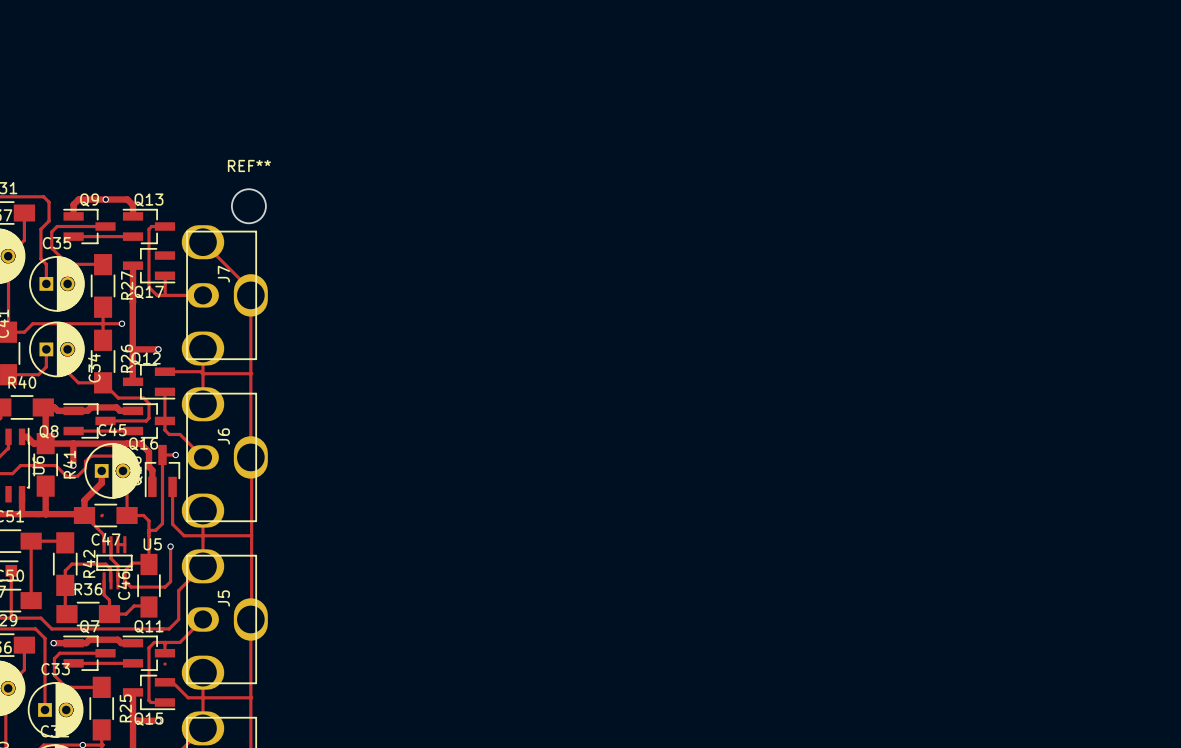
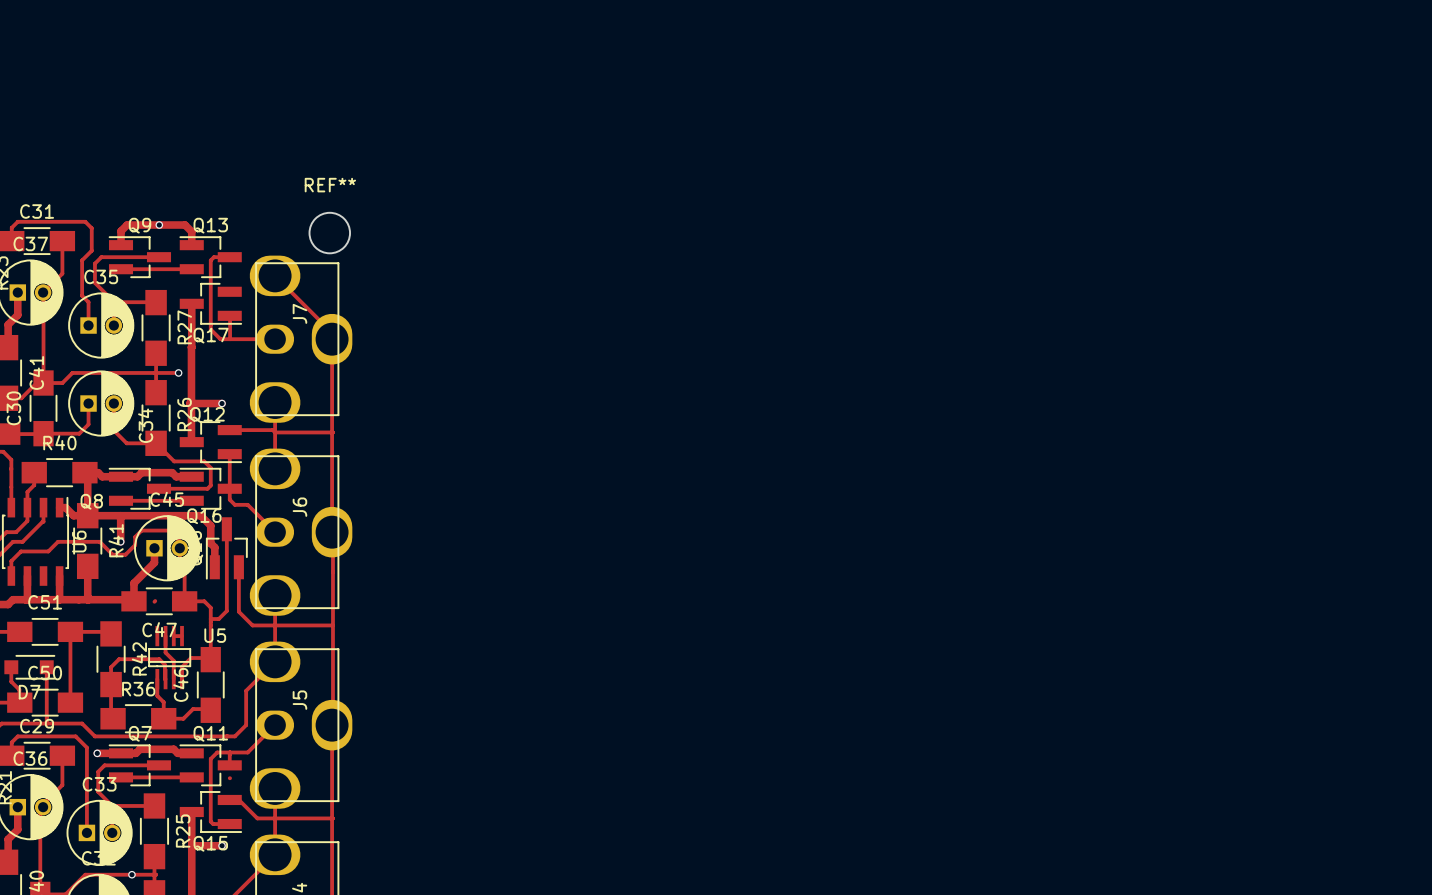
track: (175, 454) (162, 454) -> none
via: (175, 454) -> none
track: (84, 515) (104, 535) (104, 544) -> none
track: (170, 546) (170, 581) (165, 587) (131, 587) (124, 580) -> none
via: (170, 546) -> none

